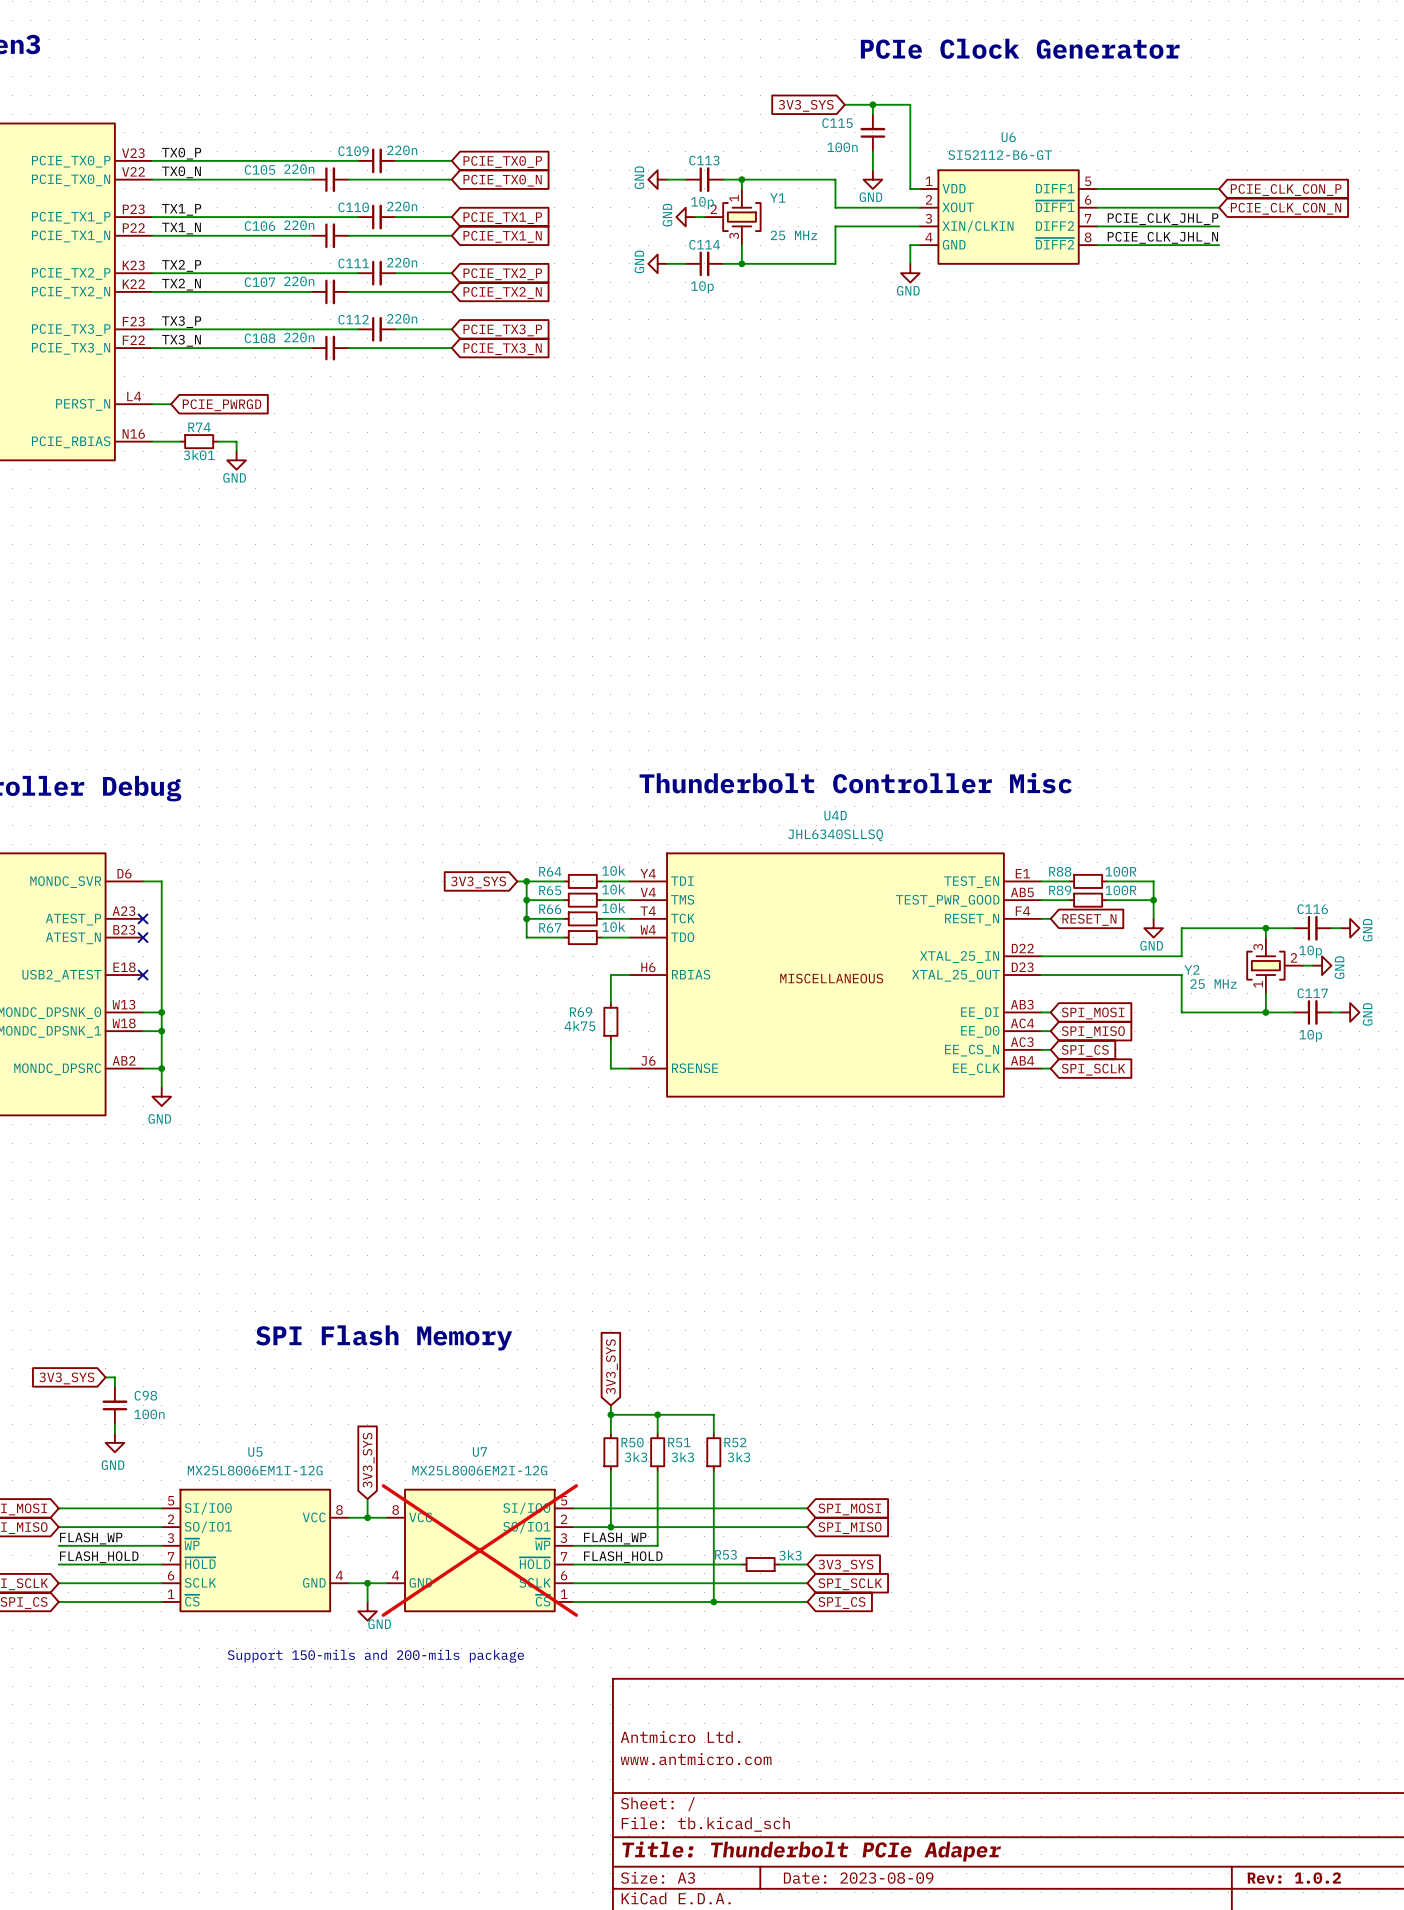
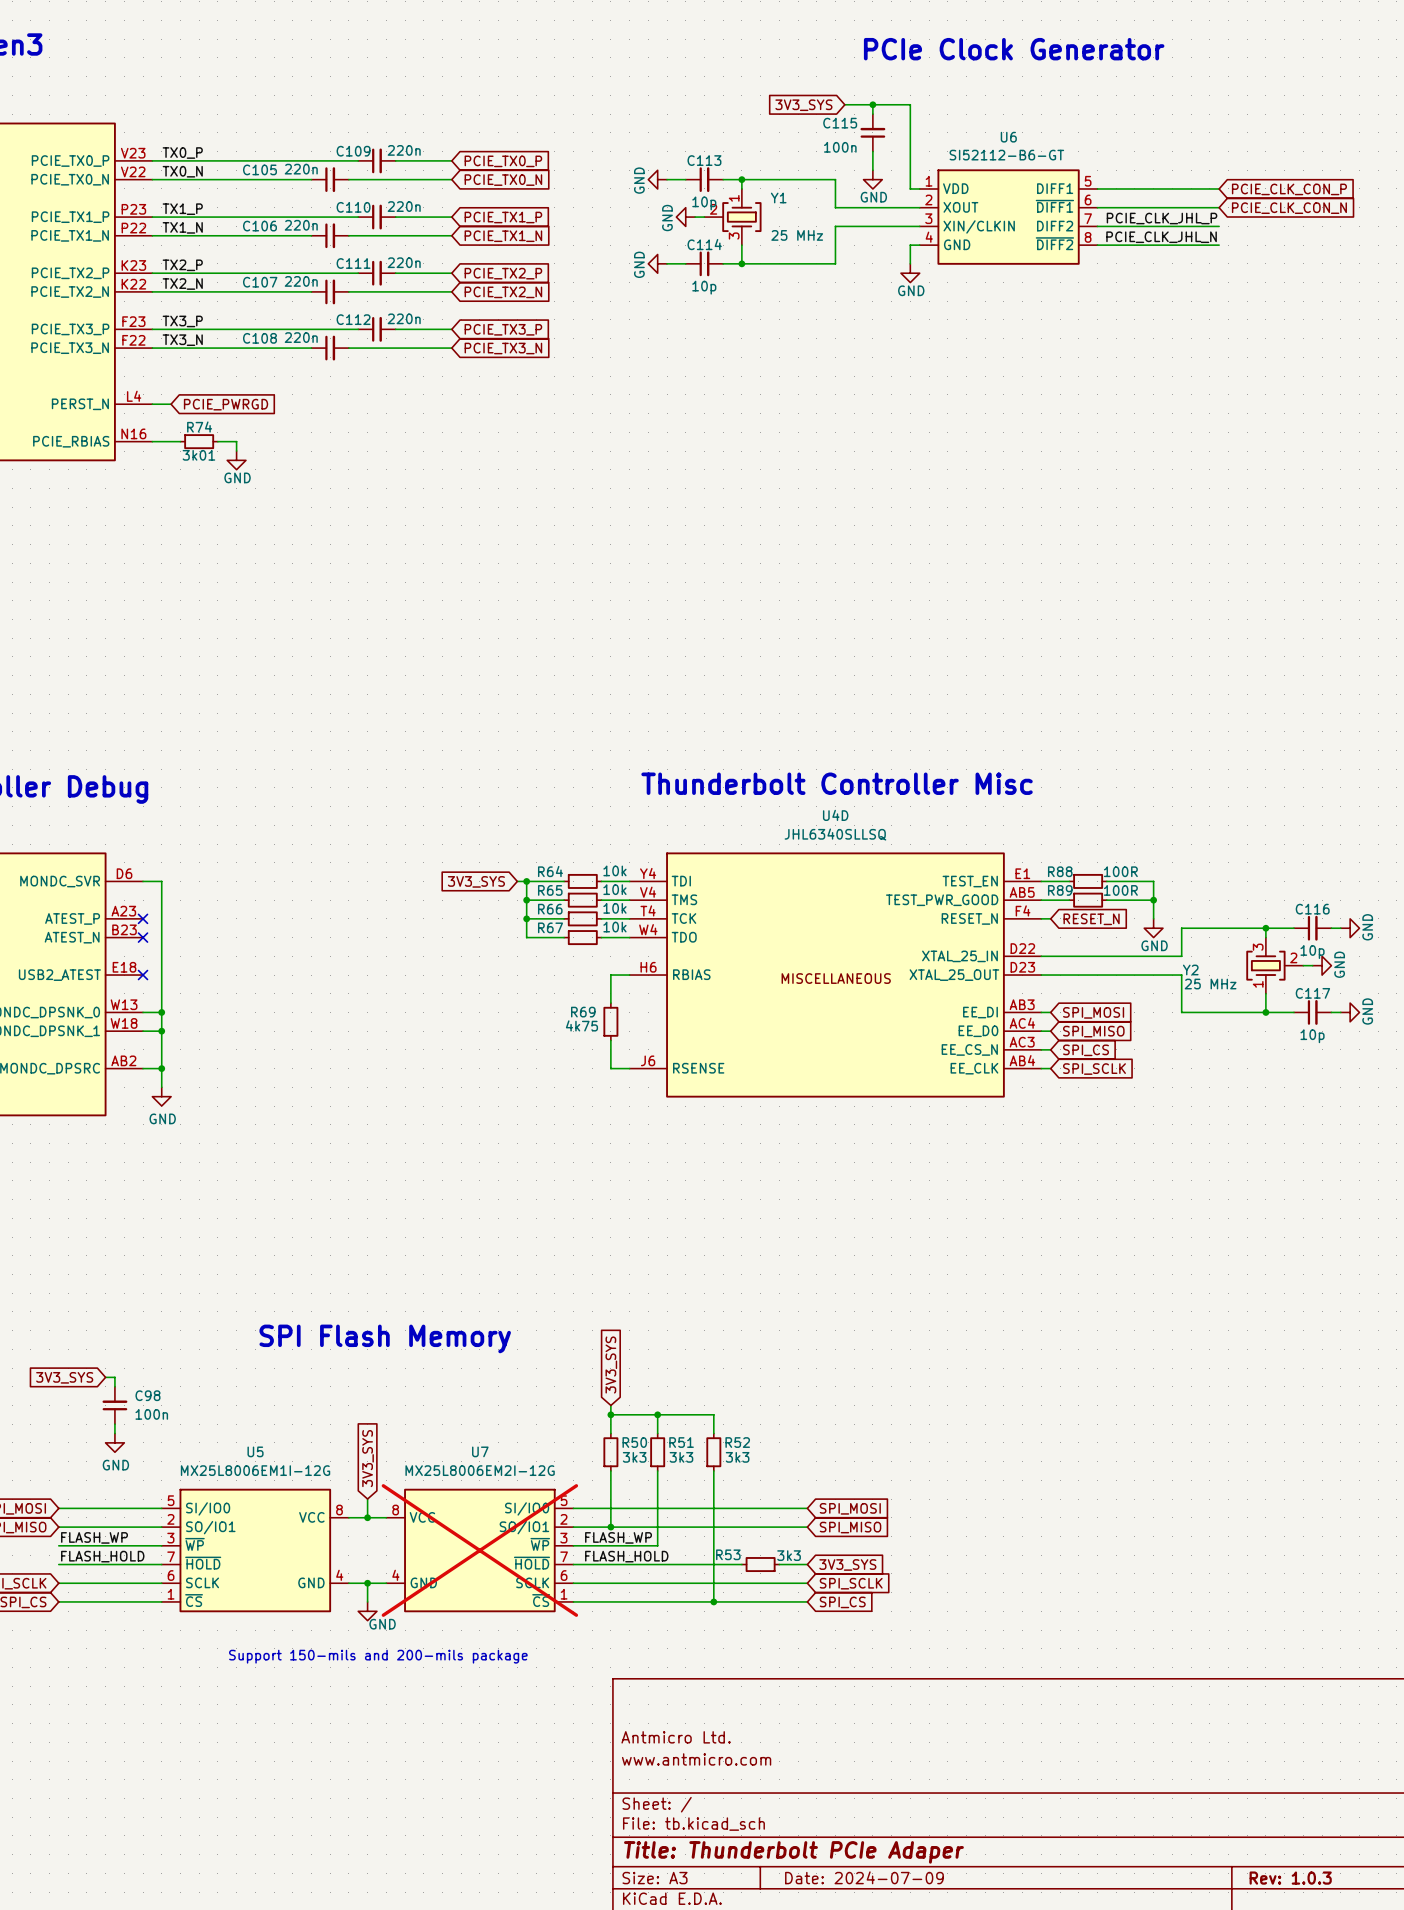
title block: Date: 2023-08-09 (858, 1878) -> Date: 2024-07-09 (864, 1877)
title block: Rev: 1.0.2 (1294, 1878) -> Rev: 1.0.3 (1290, 1878)

